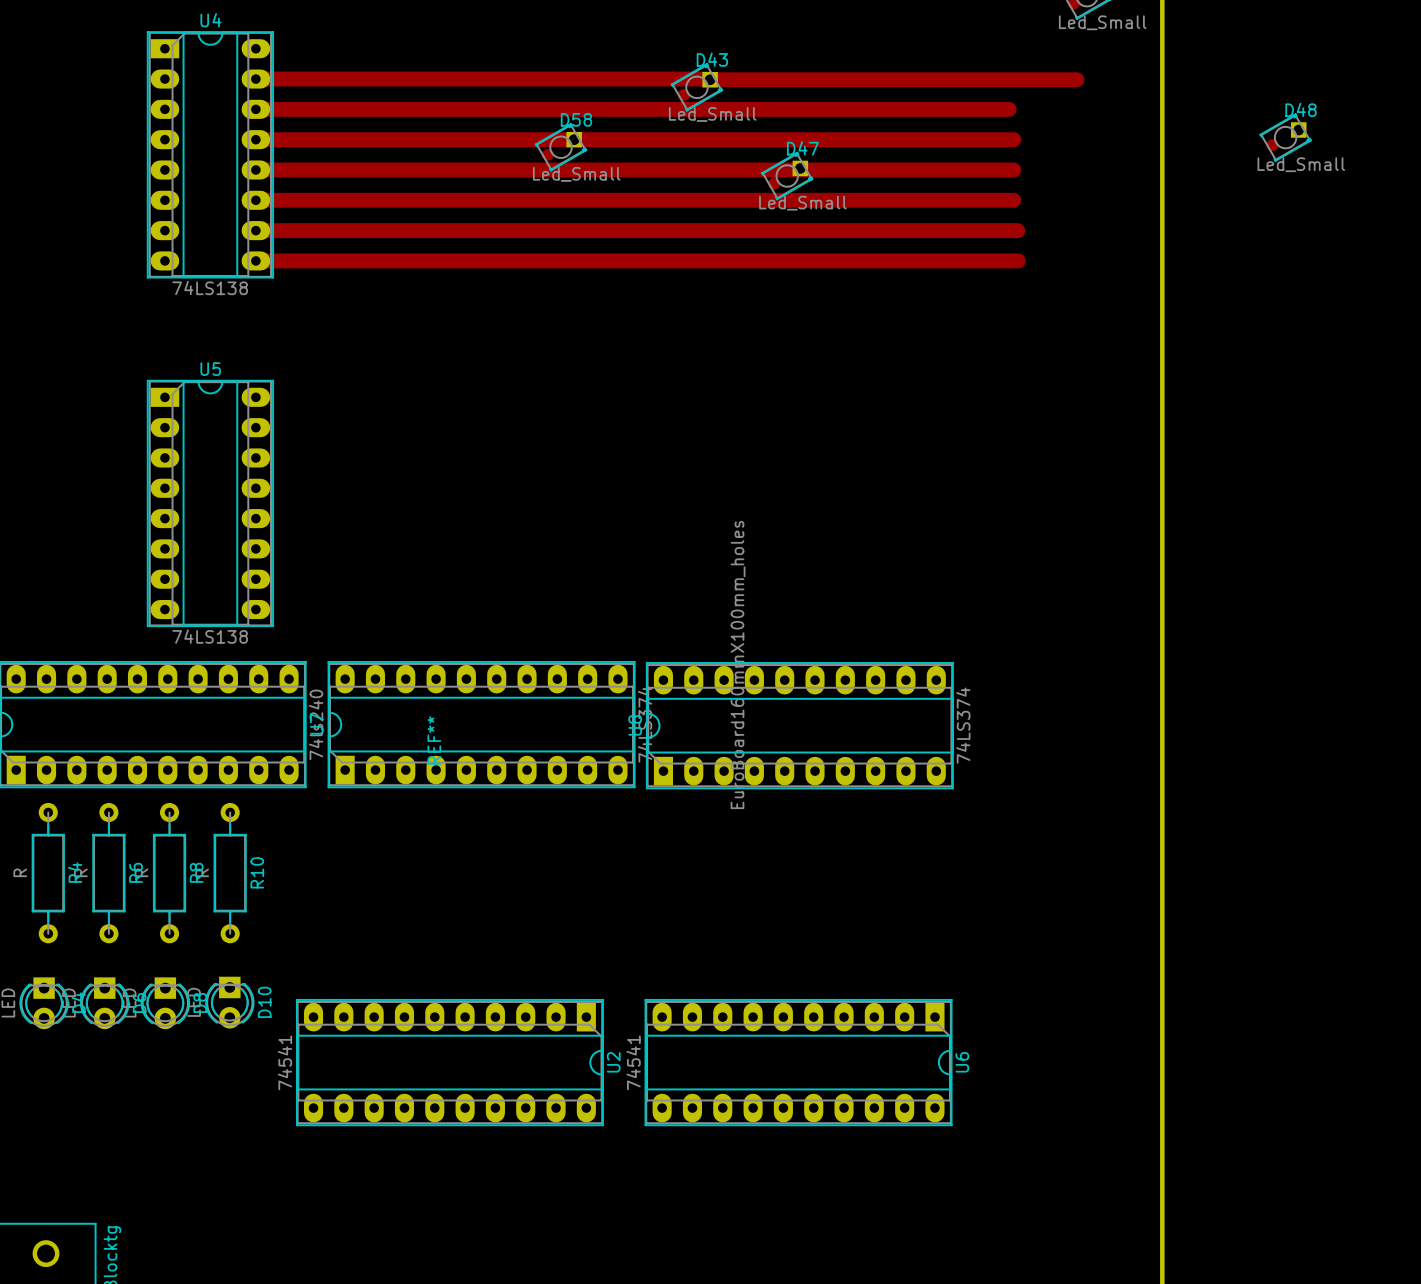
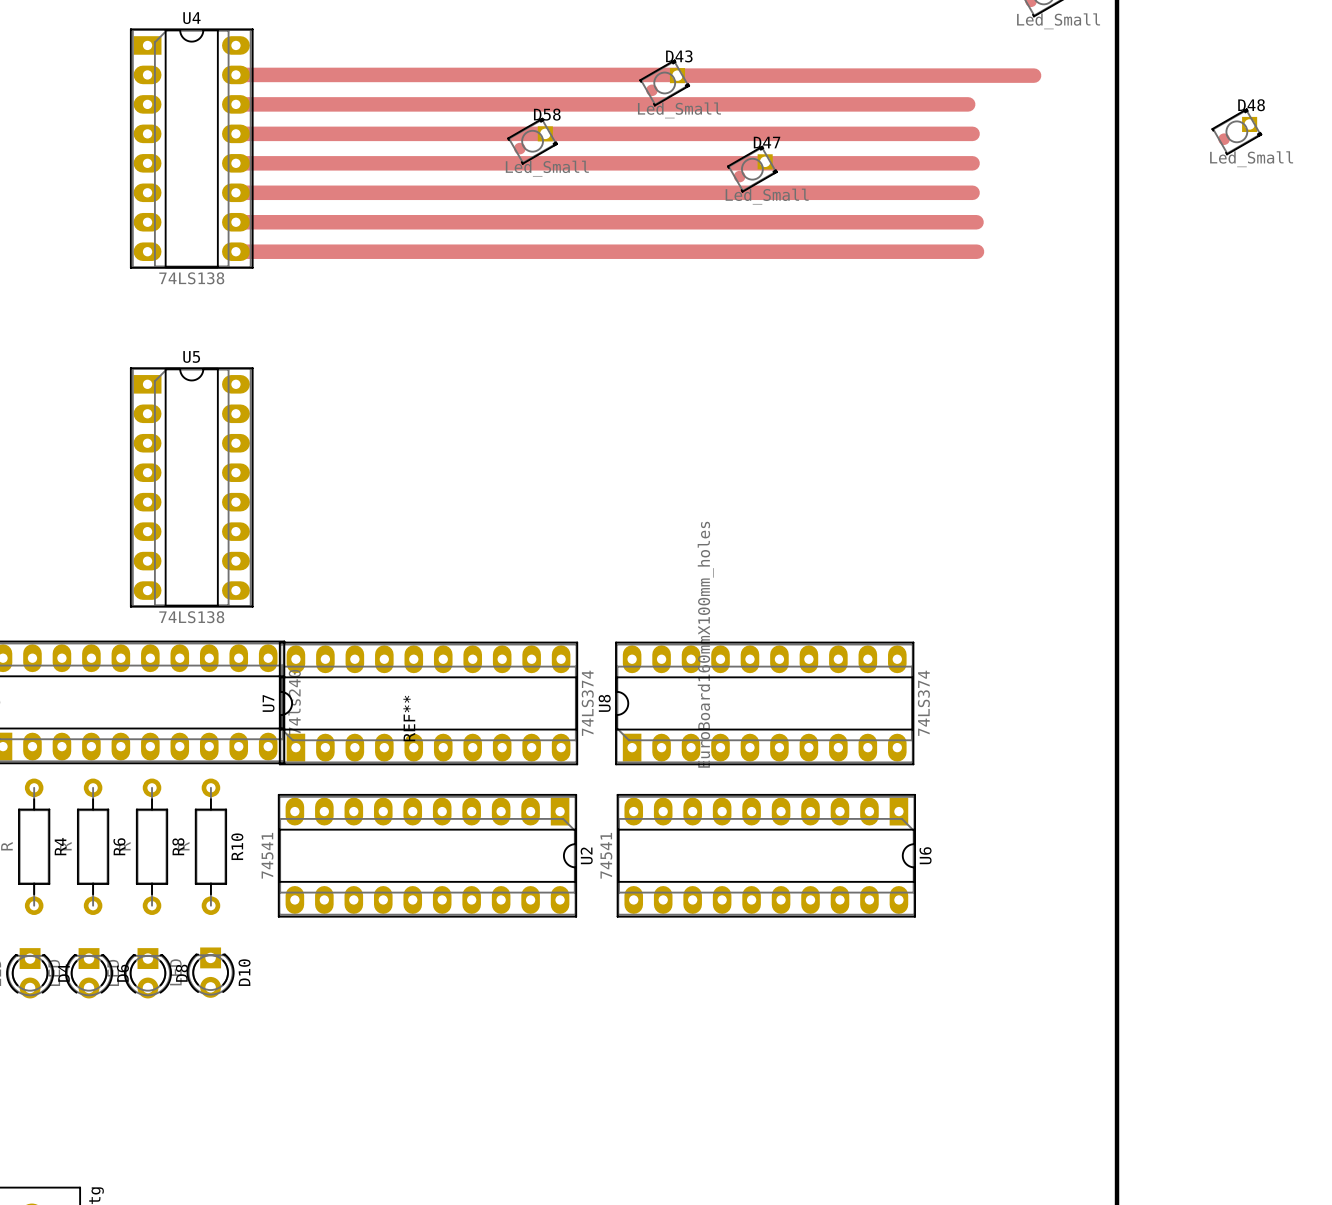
U7 position: (481, 724) -> (428, 703)
U2 position: (449, 1062) -> (427, 855)
U6 position: (798, 1062) -> (766, 855)

